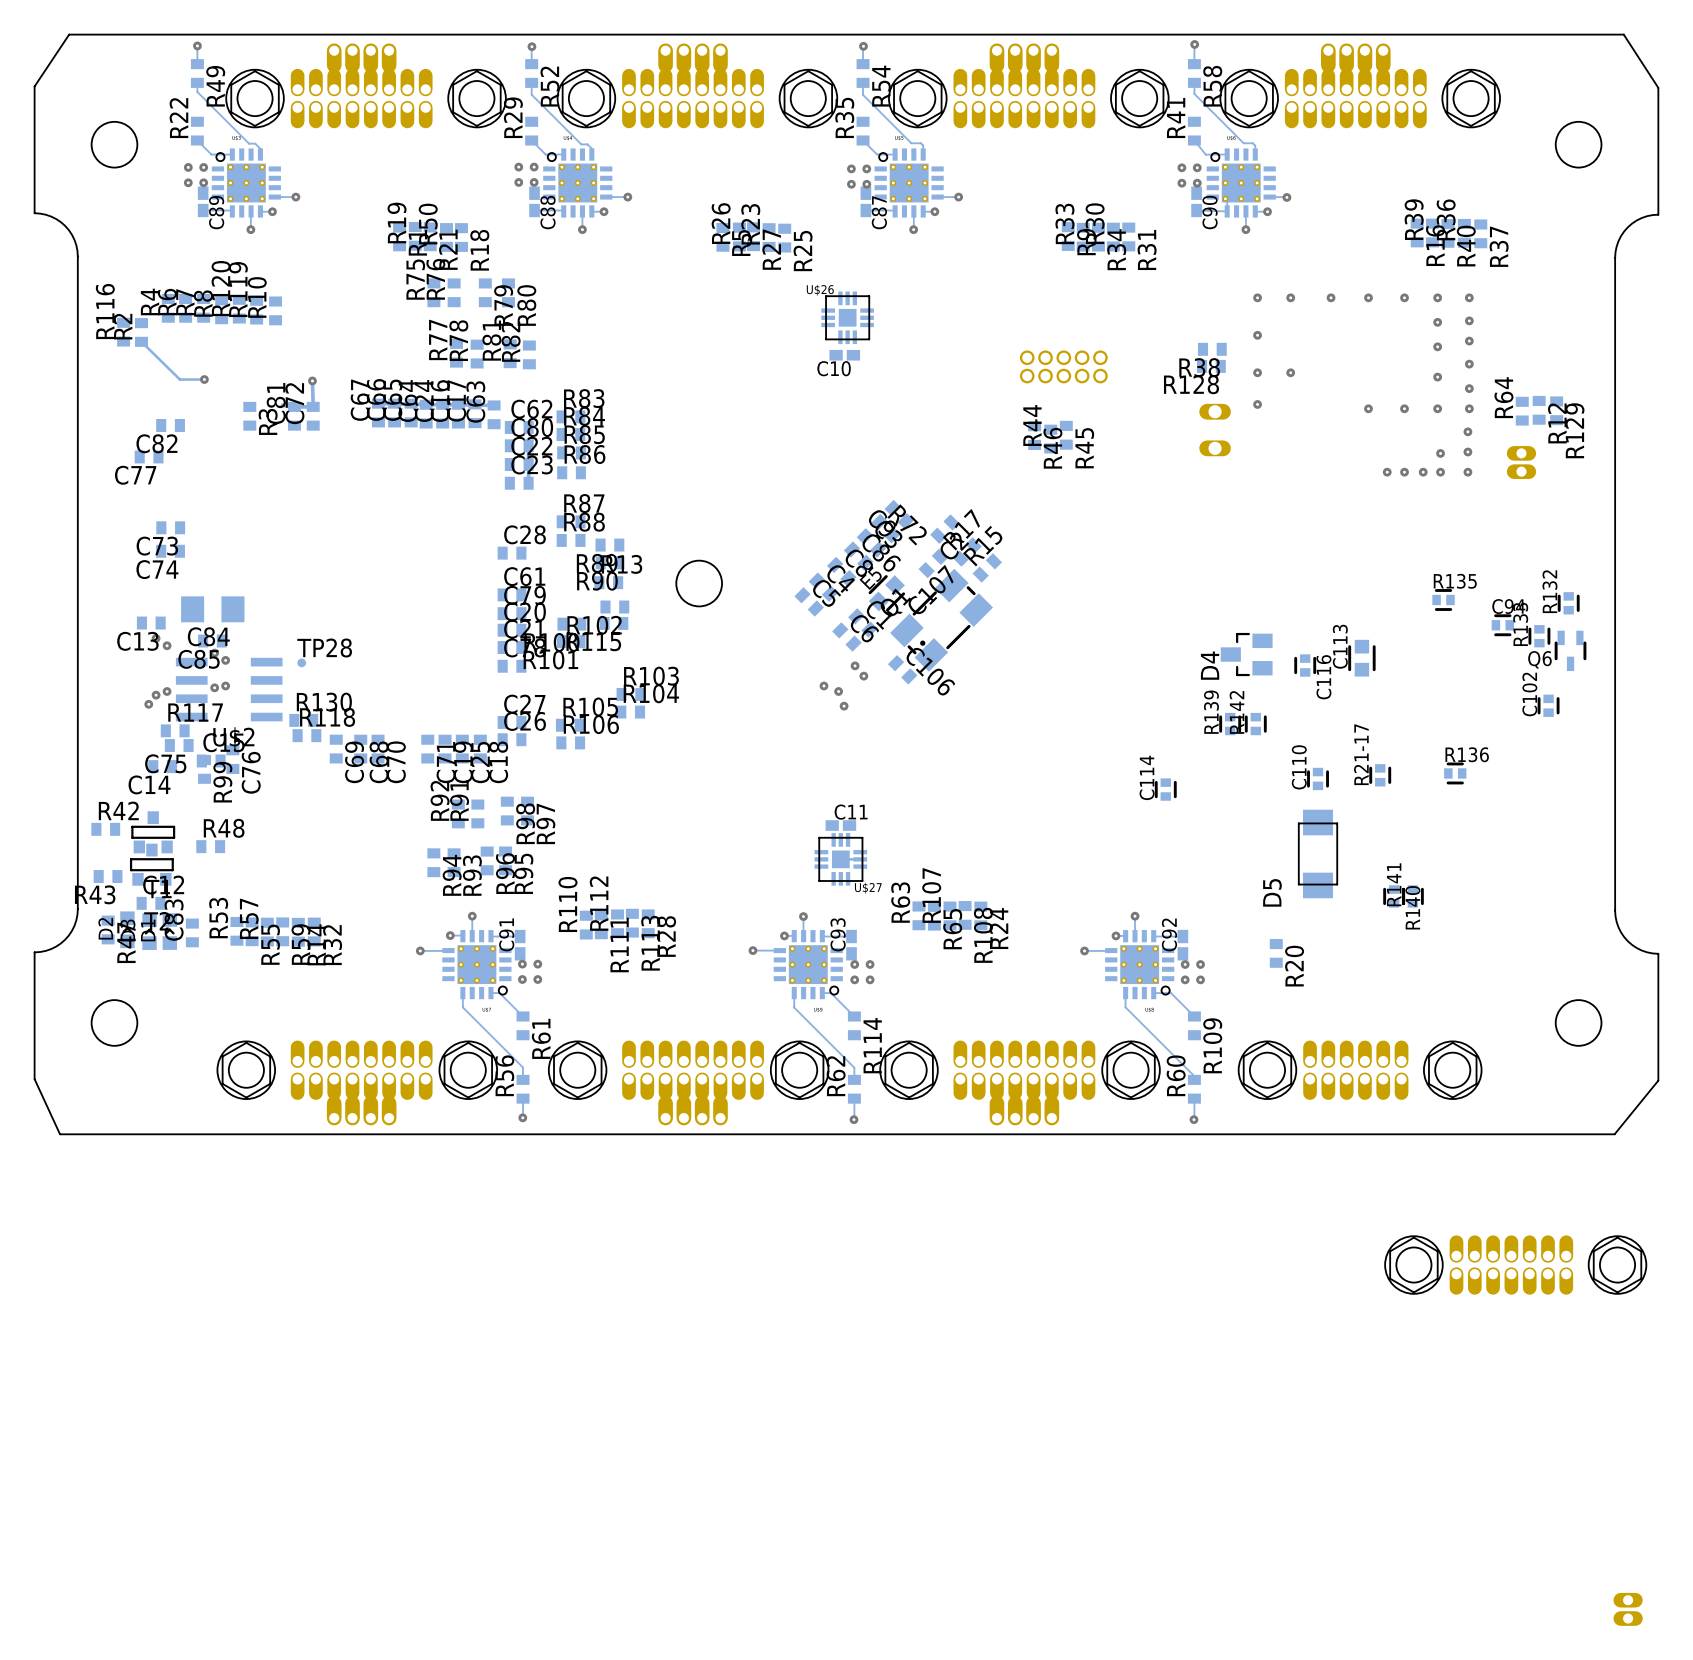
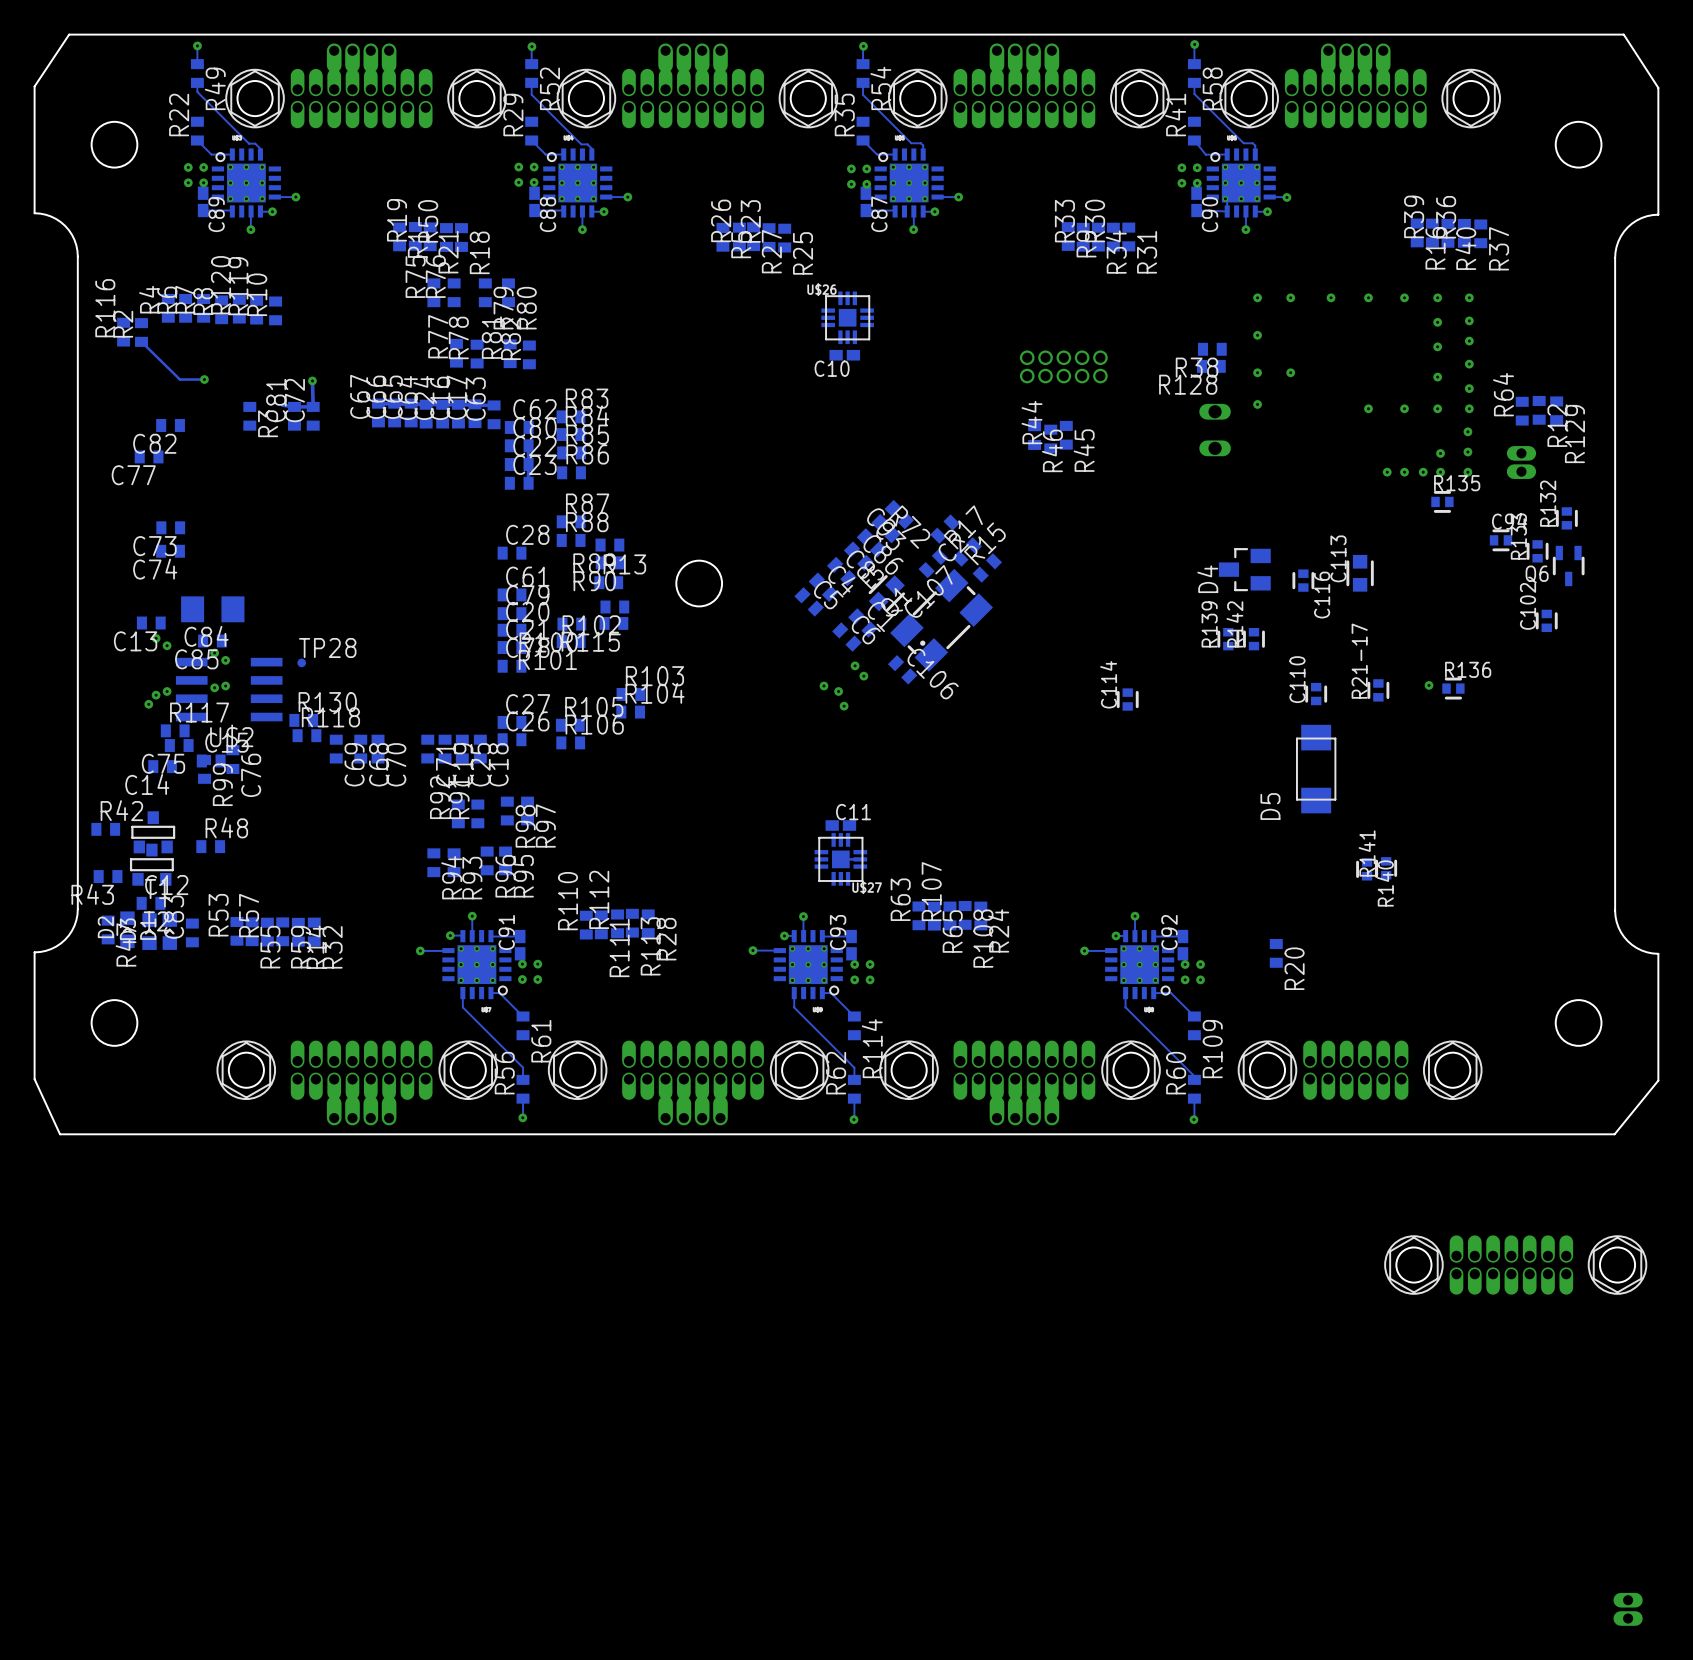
R135 position: (1443, 600) -> (1442, 501)
R132 position: (1568, 603) -> (1566, 518)
C94 position: (1502, 625) -> (1500, 540)
R133 position: (1539, 636) -> (1537, 551)
Q6 position: (1570, 650) -> (1568, 565)
D4 position: (1246, 654) -> (1244, 569)
C113 position: (1361, 658) -> (1360, 573)
C116 position: (1305, 665) -> (1303, 580)
via: none -> (1429, 685)
C102 position: (1548, 705) -> (1546, 620)
R139 position: (1230, 724) -> (1228, 639)
R142 position: (1255, 724) -> (1253, 639)
R136 position: (1455, 773) -> (1453, 688)
R21-17 position: (1380, 775) -> (1378, 690)
C110 position: (1318, 778) -> (1316, 694)
C114 position: (1165, 789) -> (1127, 699)
D5 position: (1318, 853) -> (1316, 769)
R140 position: (1394, 896) -> (1367, 869)
R141 position: (1412, 896) -> (1386, 868)

